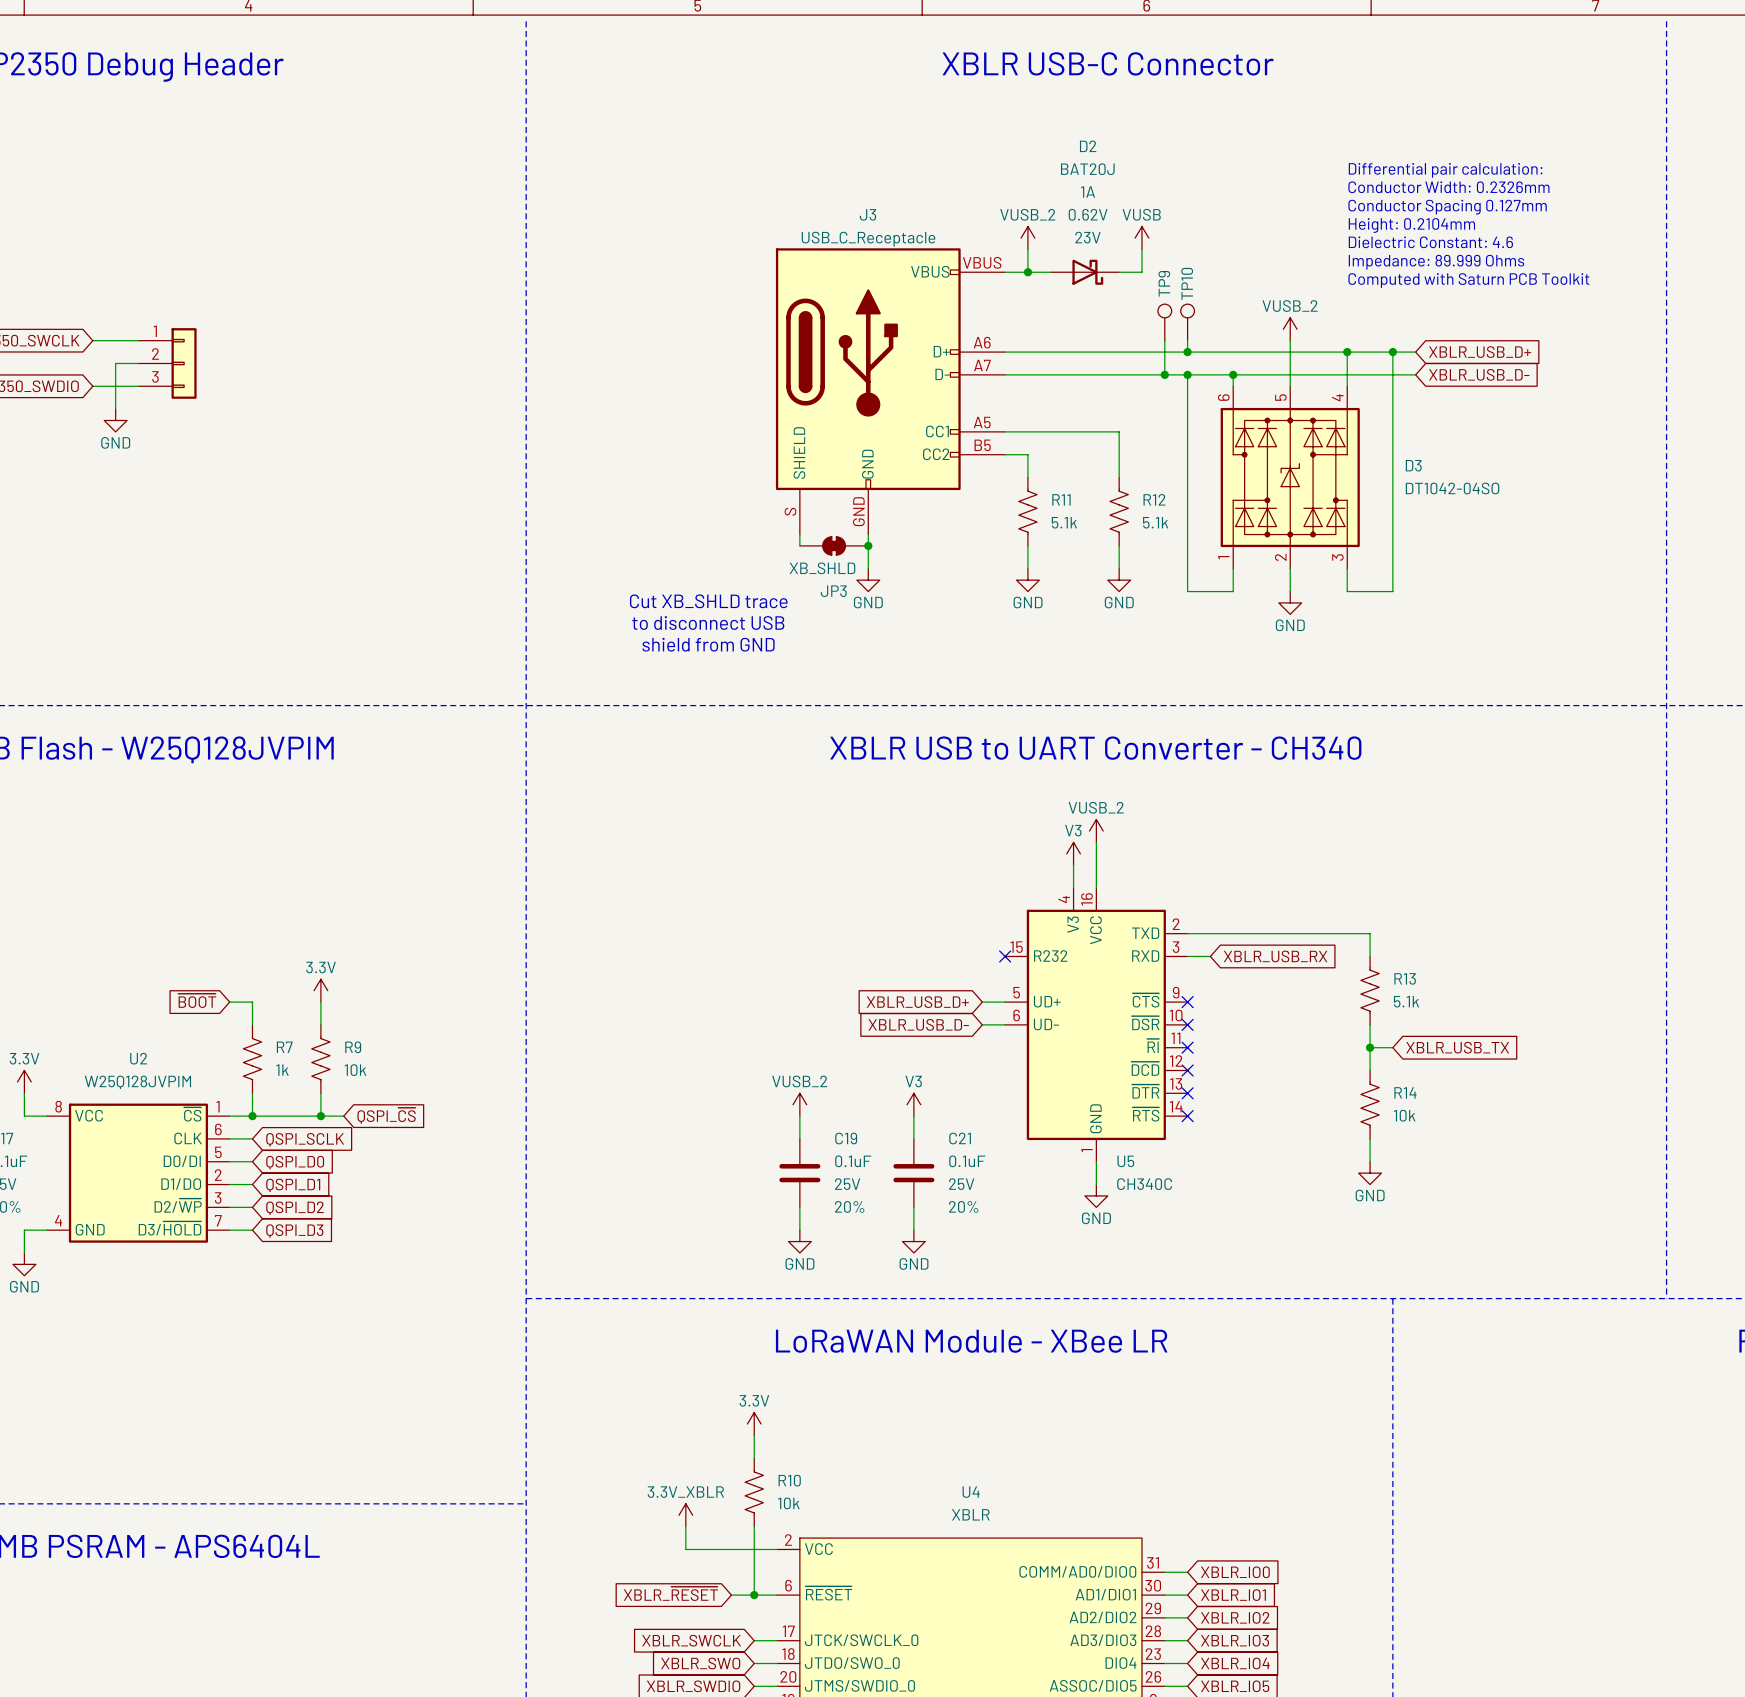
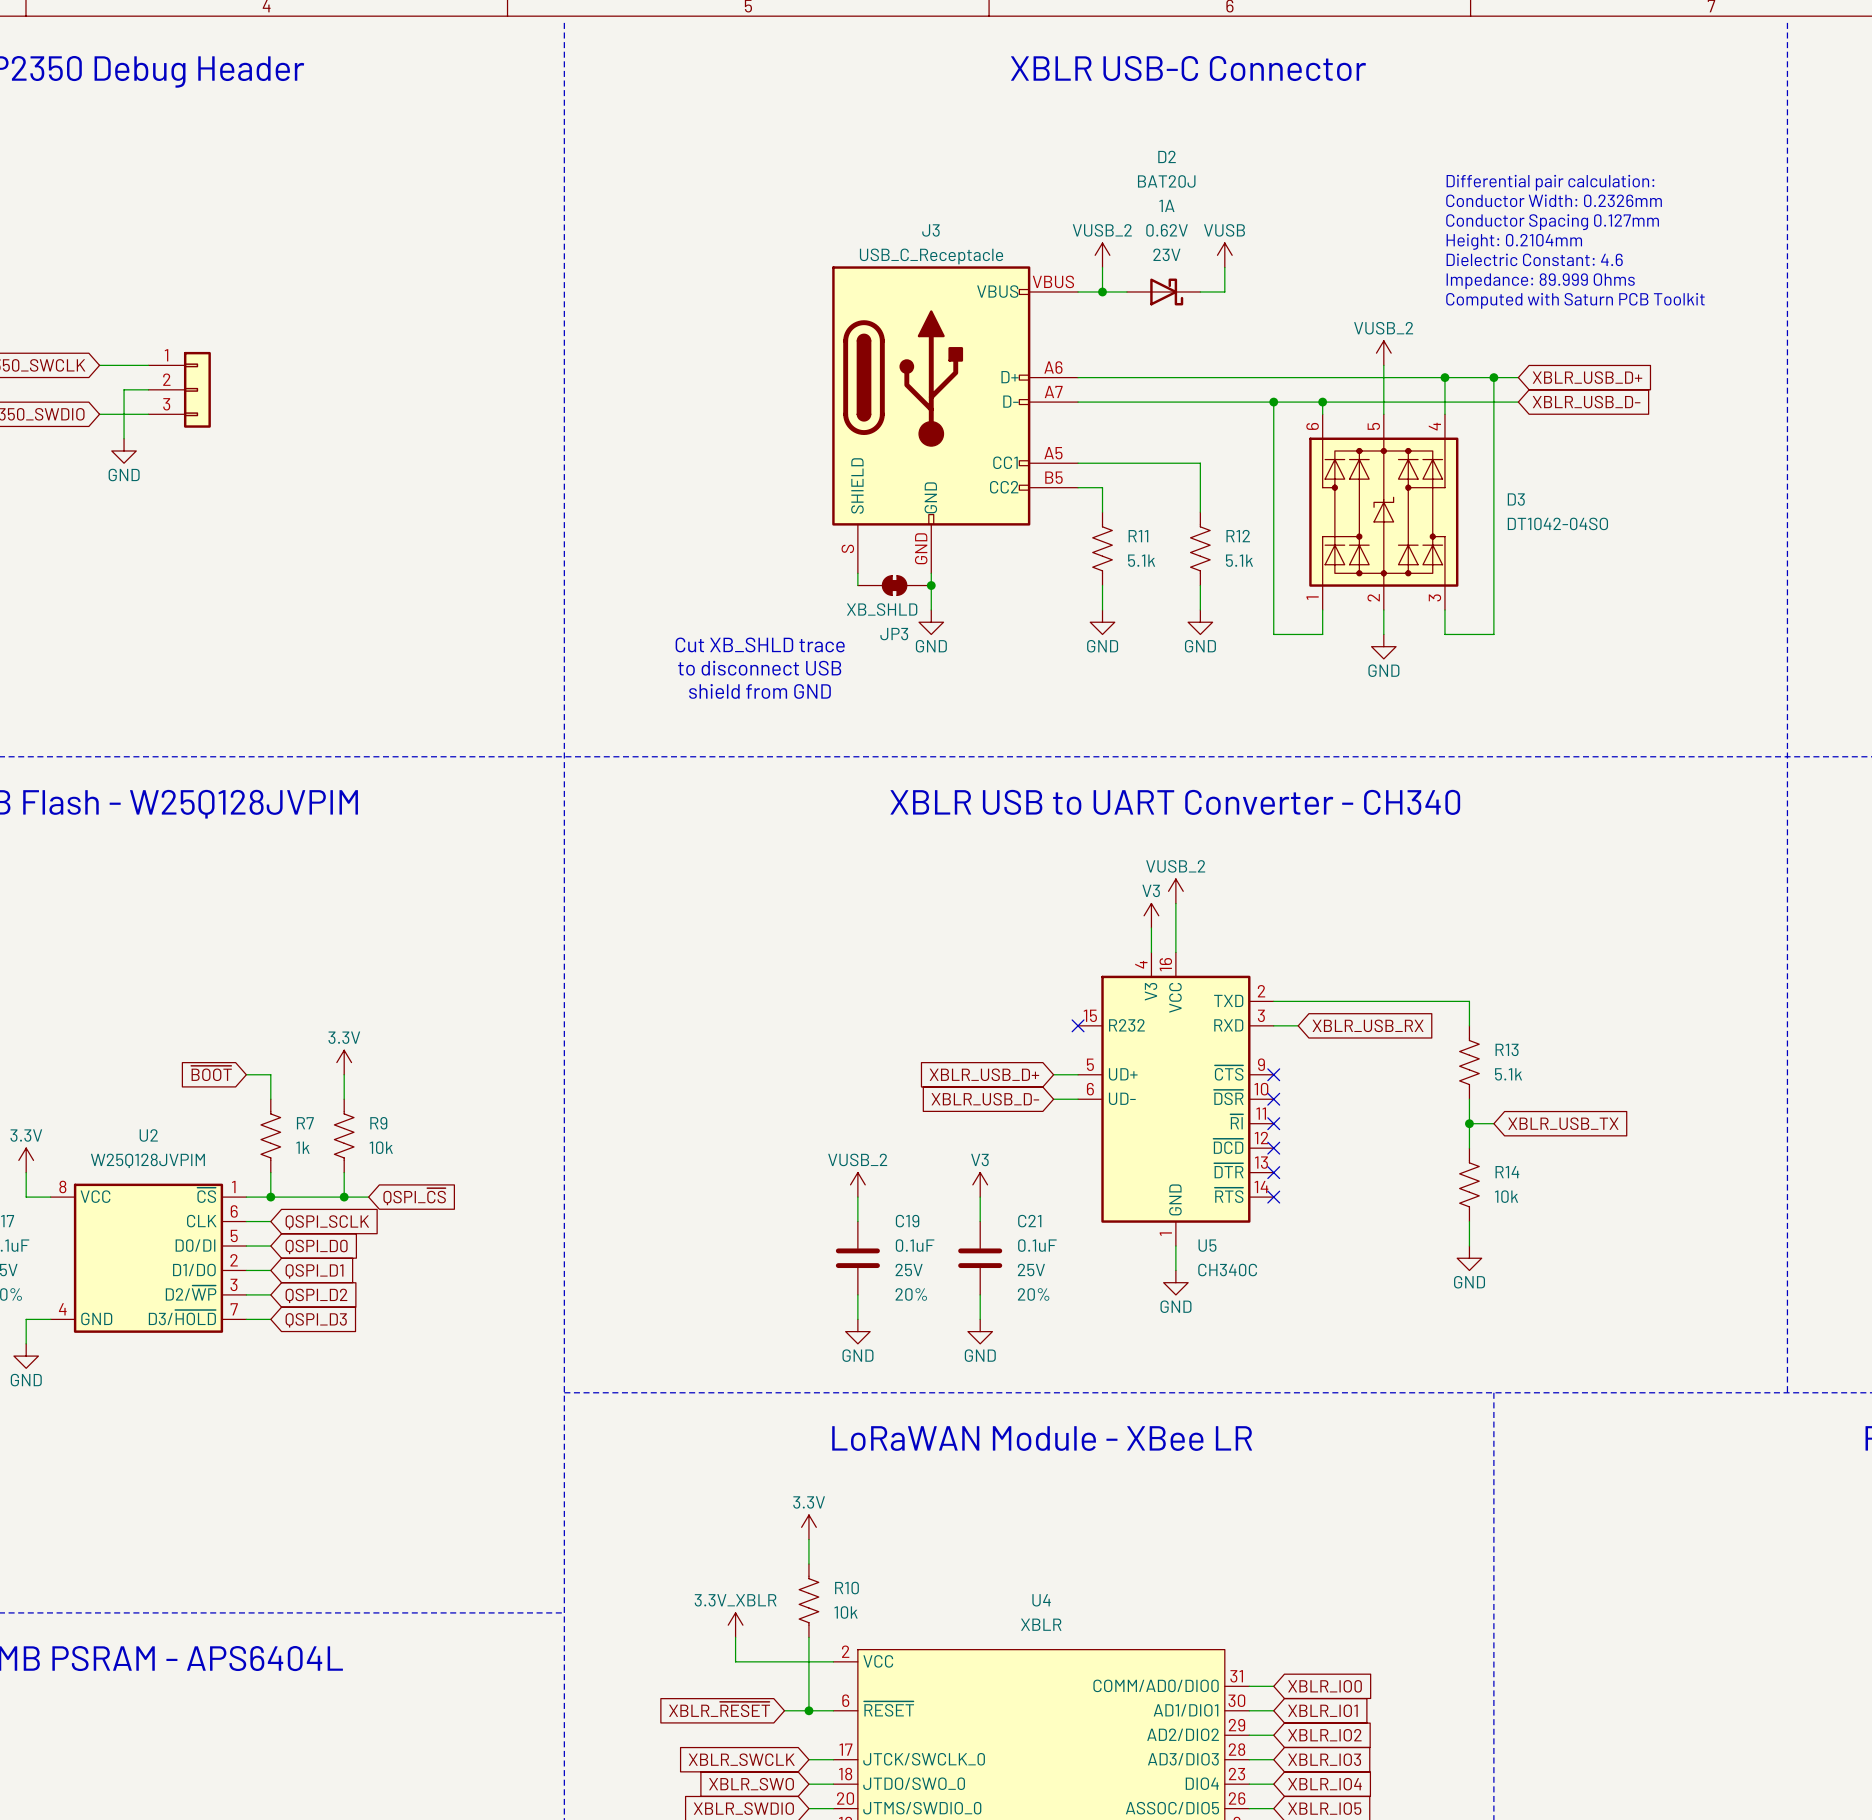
TP9: (1164, 322) -> none
TP10: (1187, 322) -> none
wire: (1164, 340) (1164, 374) -> none
wire: (1187, 340) (1187, 352) -> none
junction: (1187, 352) -> none
junction: (1164, 374) -> none

